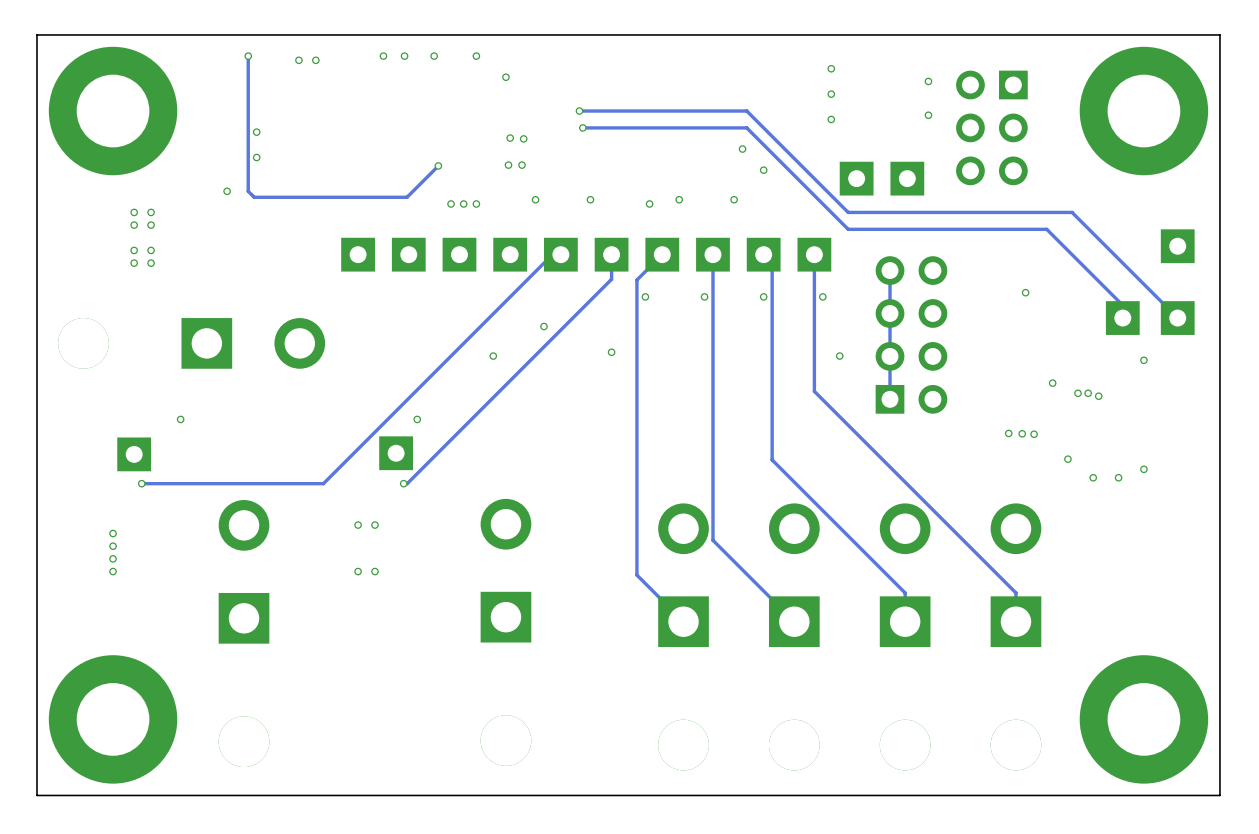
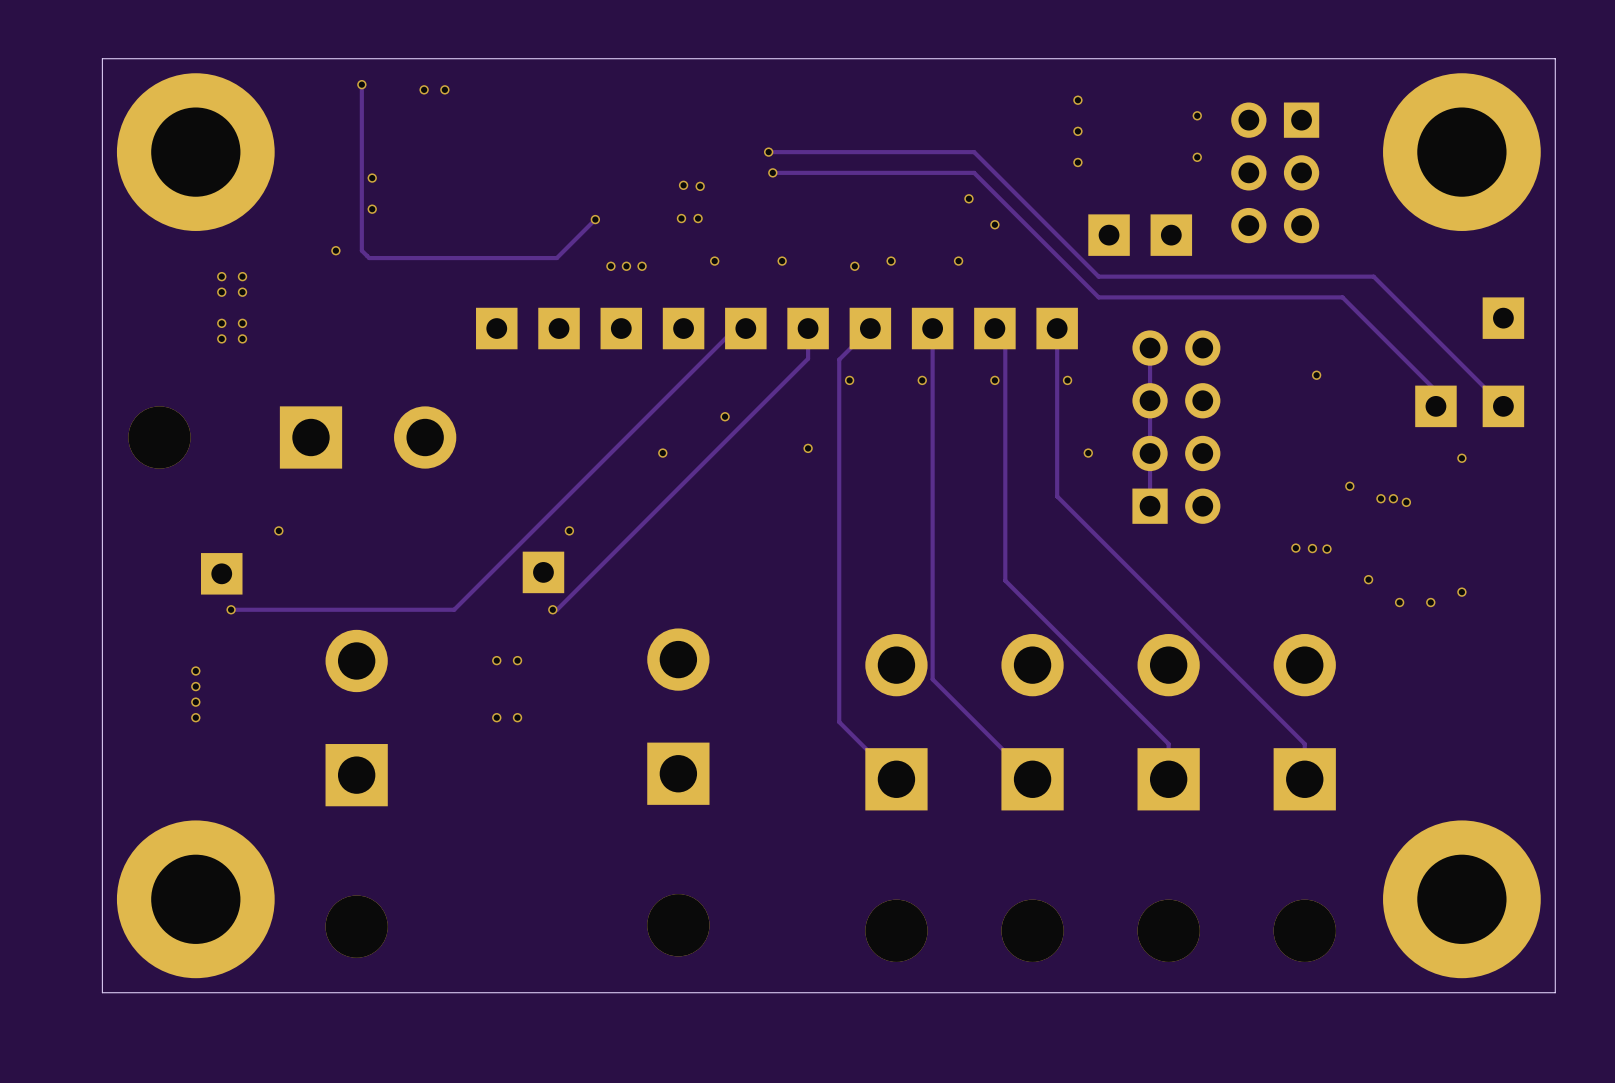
via: (383, 56) -> none
via: (404, 56) -> none
via: (434, 56) -> none
via: (476, 56) -> none
via: (505, 77) -> none

